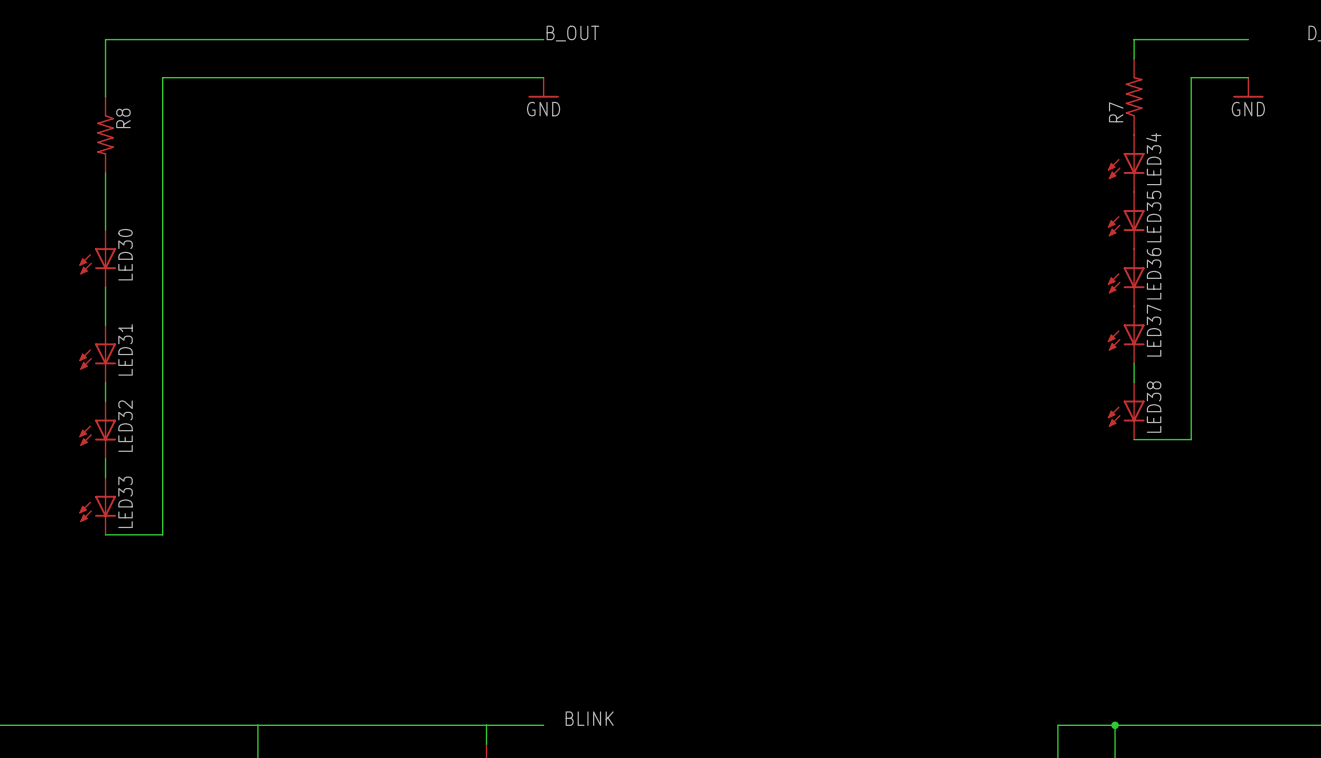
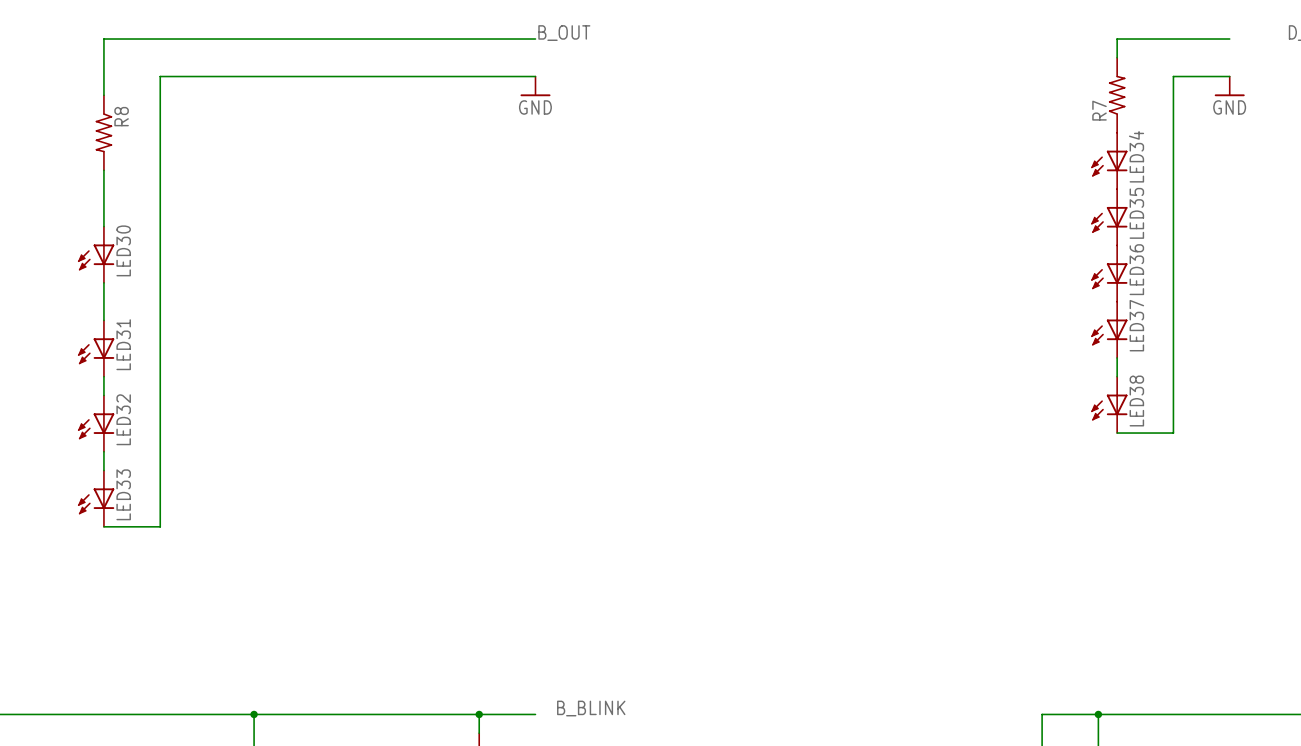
label: BLINK (589, 718) -> B_BLINK (591, 708)
junction: none -> (254, 714)
junction: none -> (479, 714)

